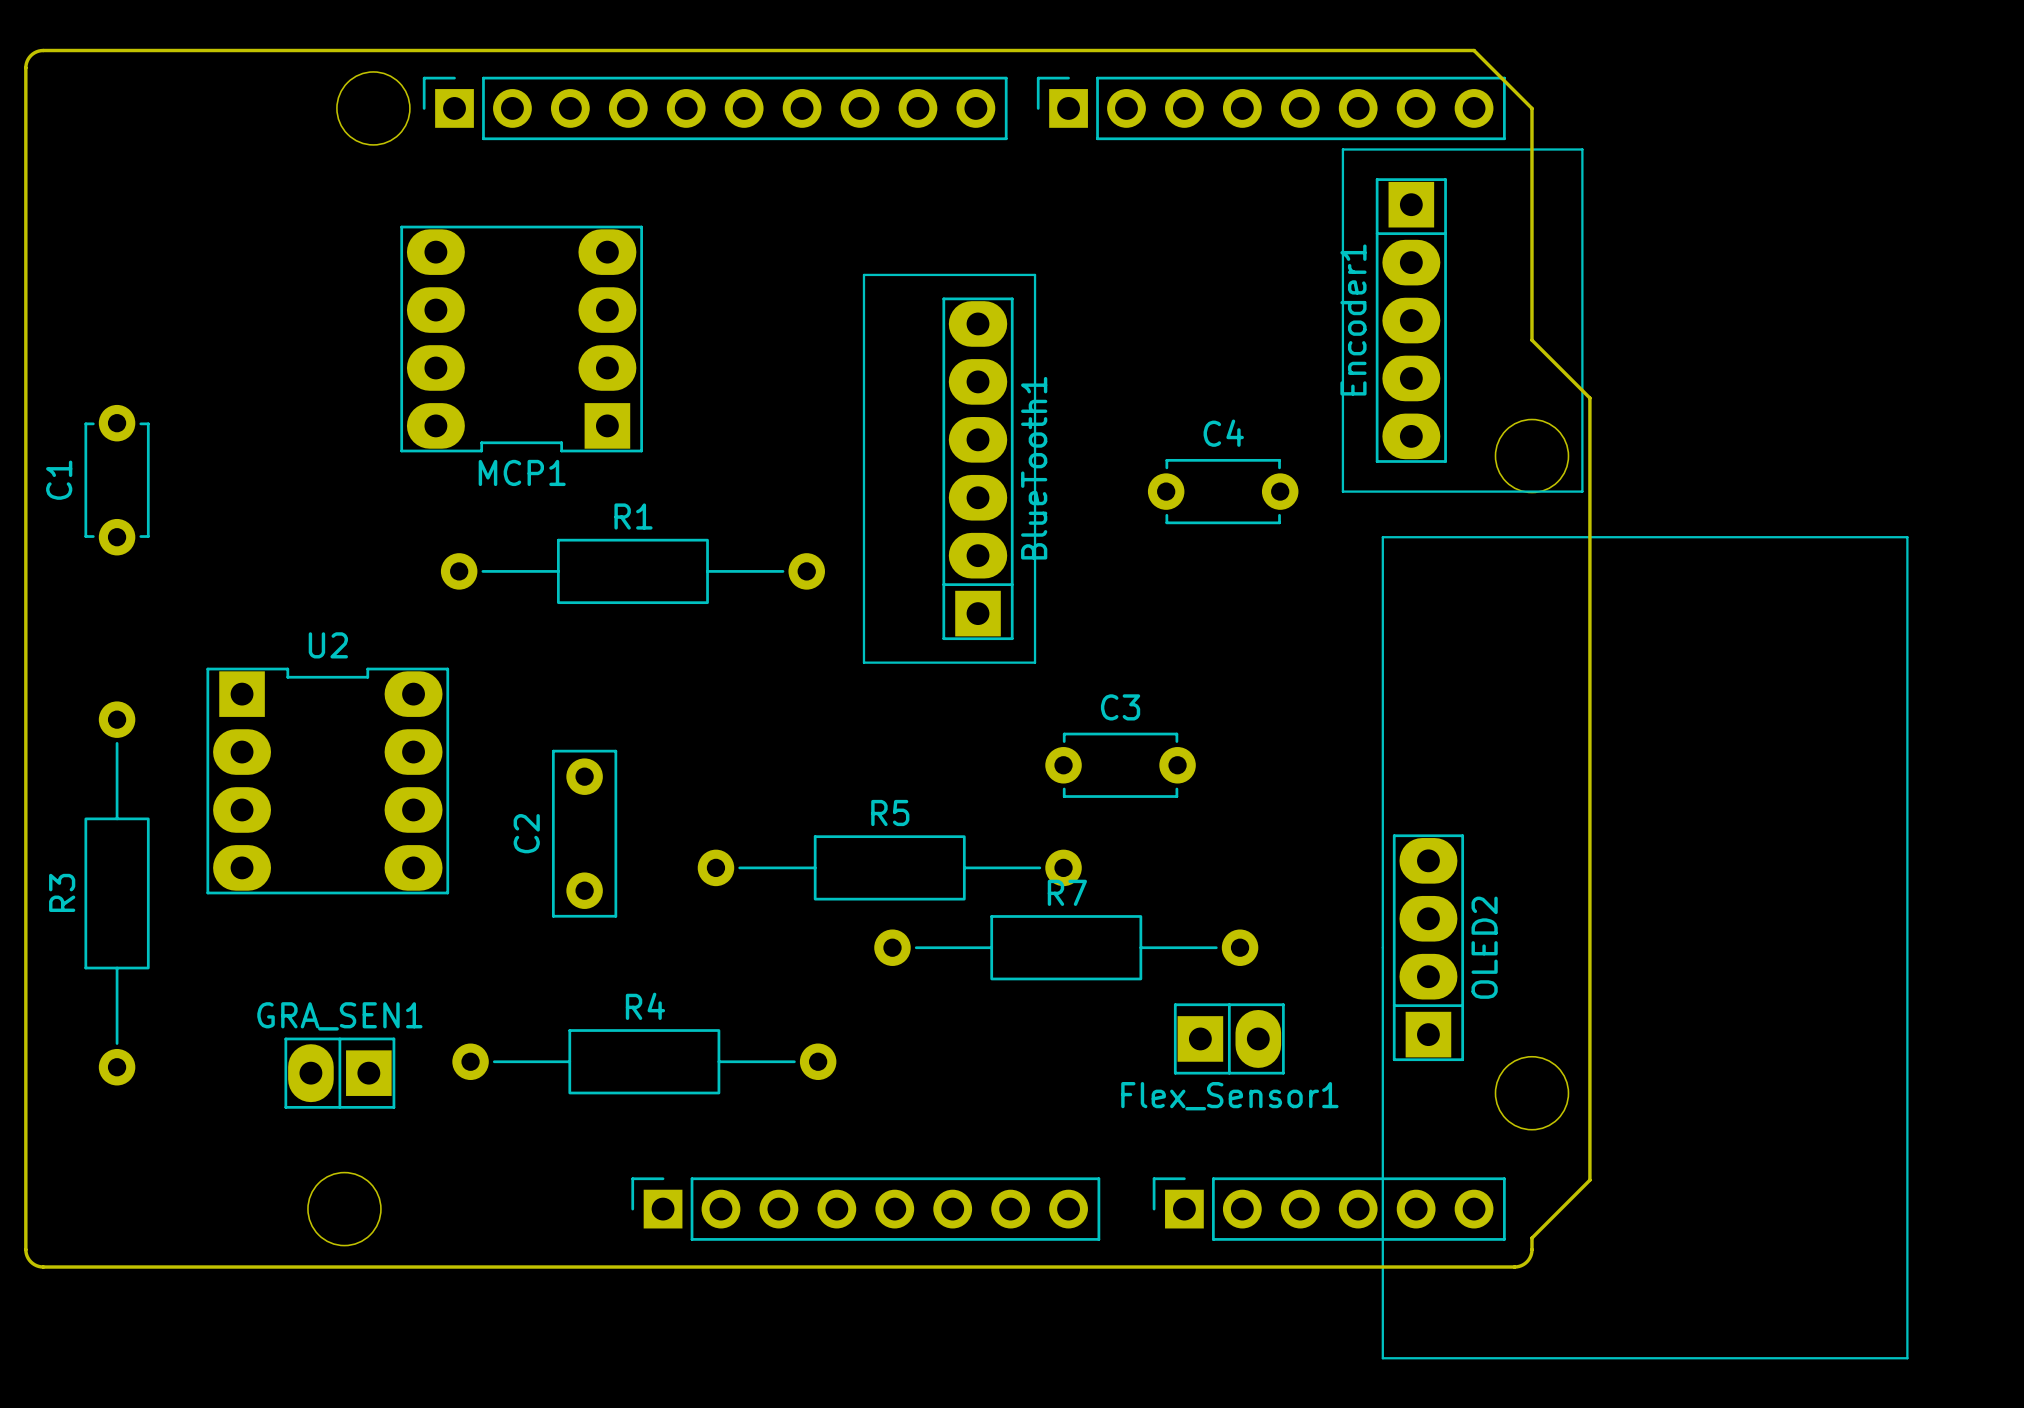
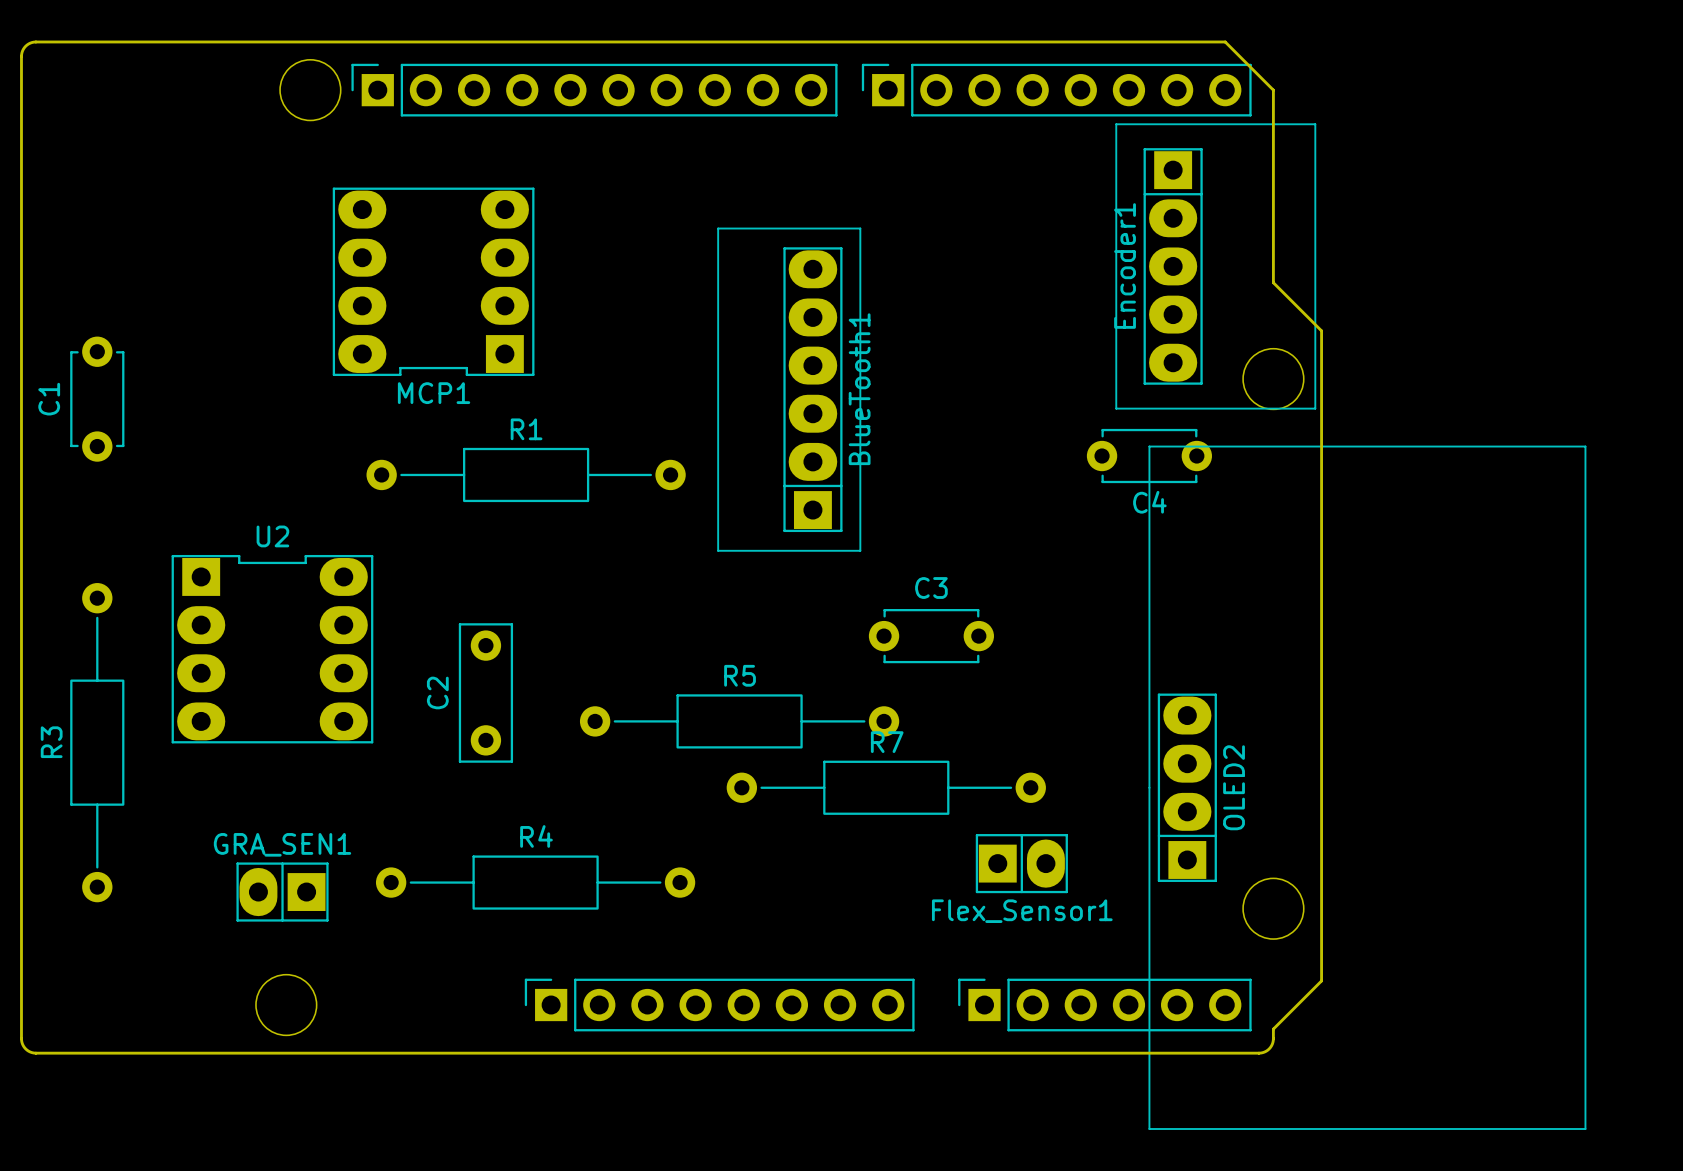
C4 name position: C4 (1223, 433) -> C4 (1149, 502)
C4 position: (1223, 491) -> (1149, 456)

